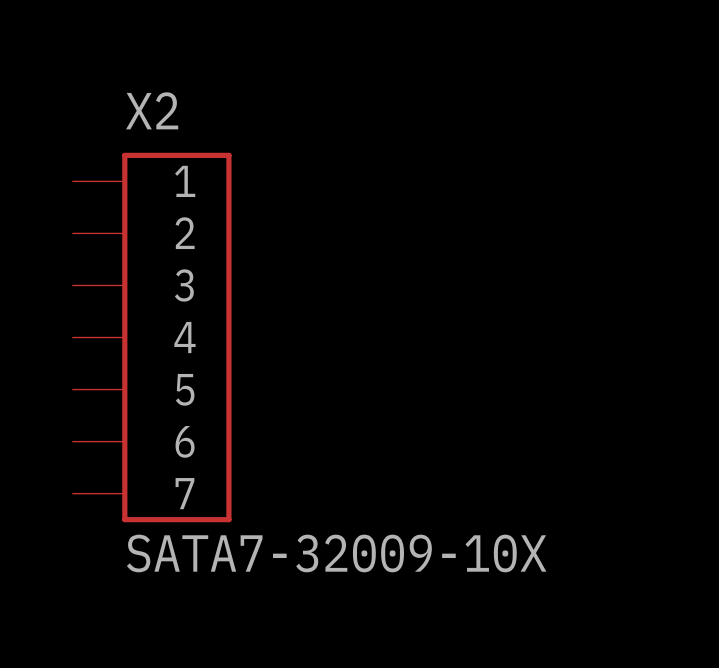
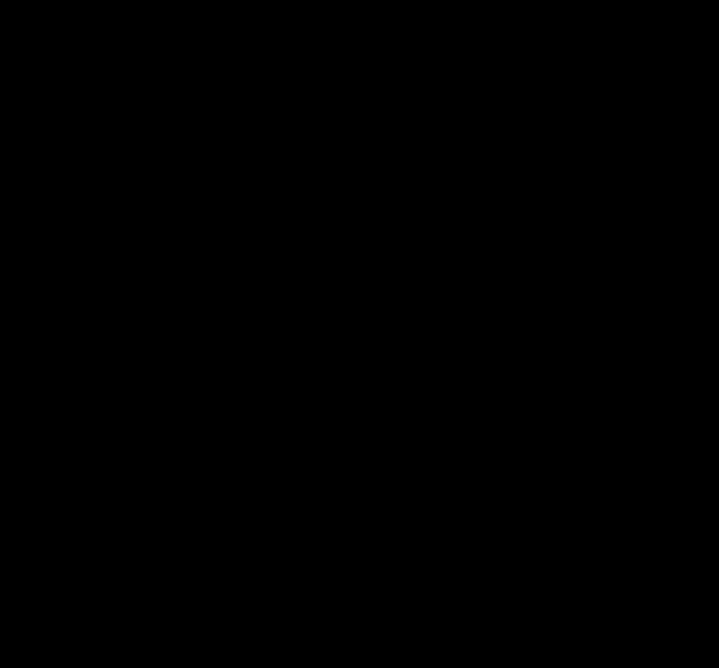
X2: SATA7-32009-10X (152, 337) -> none

